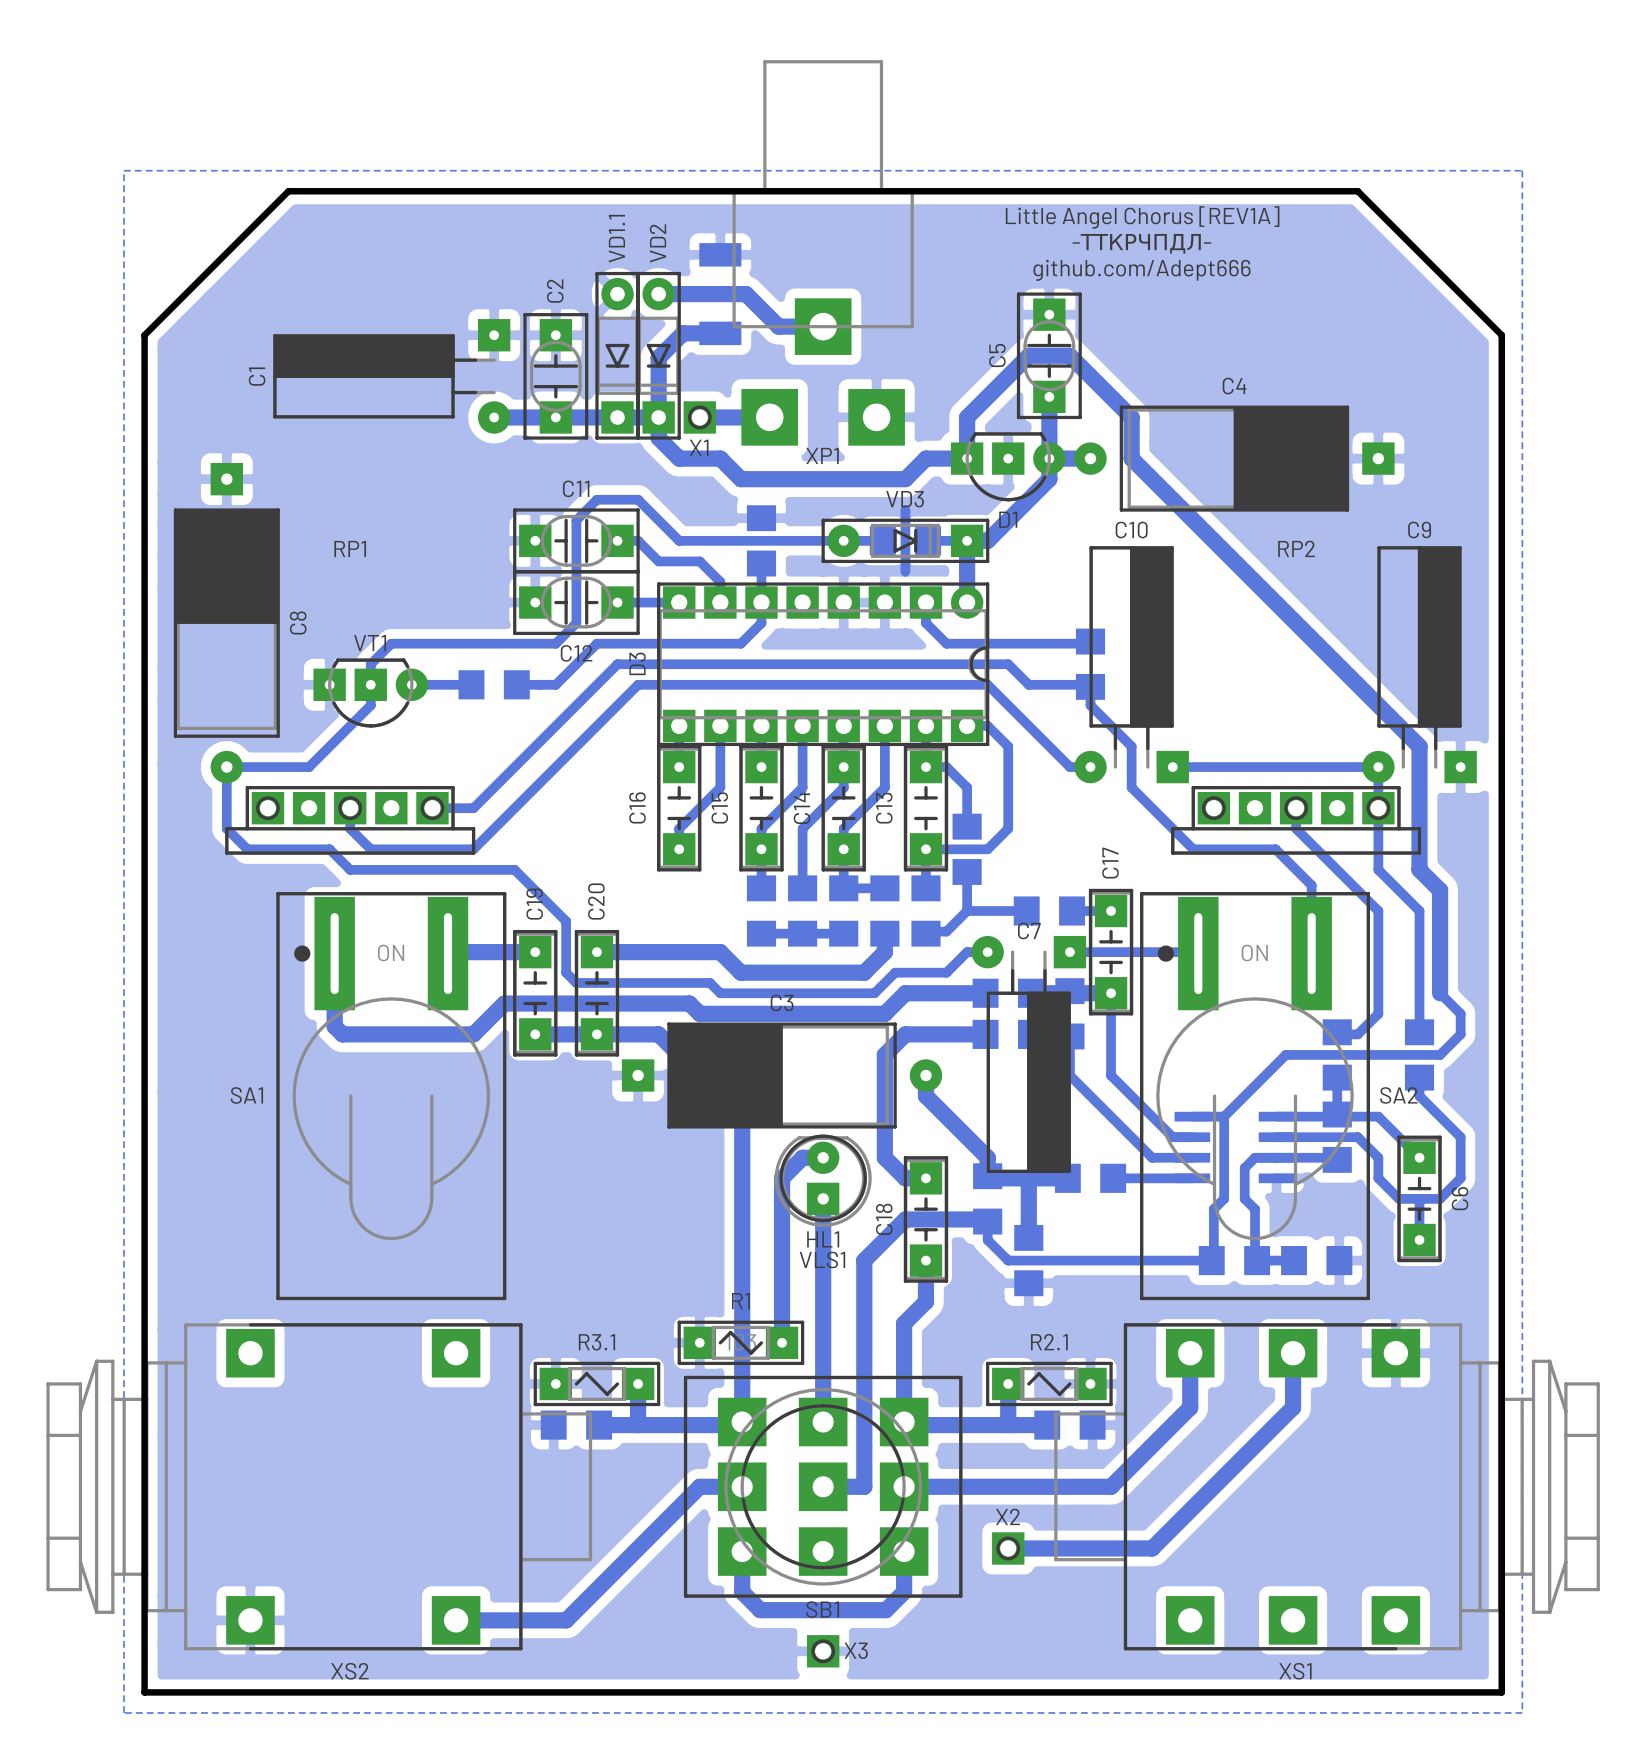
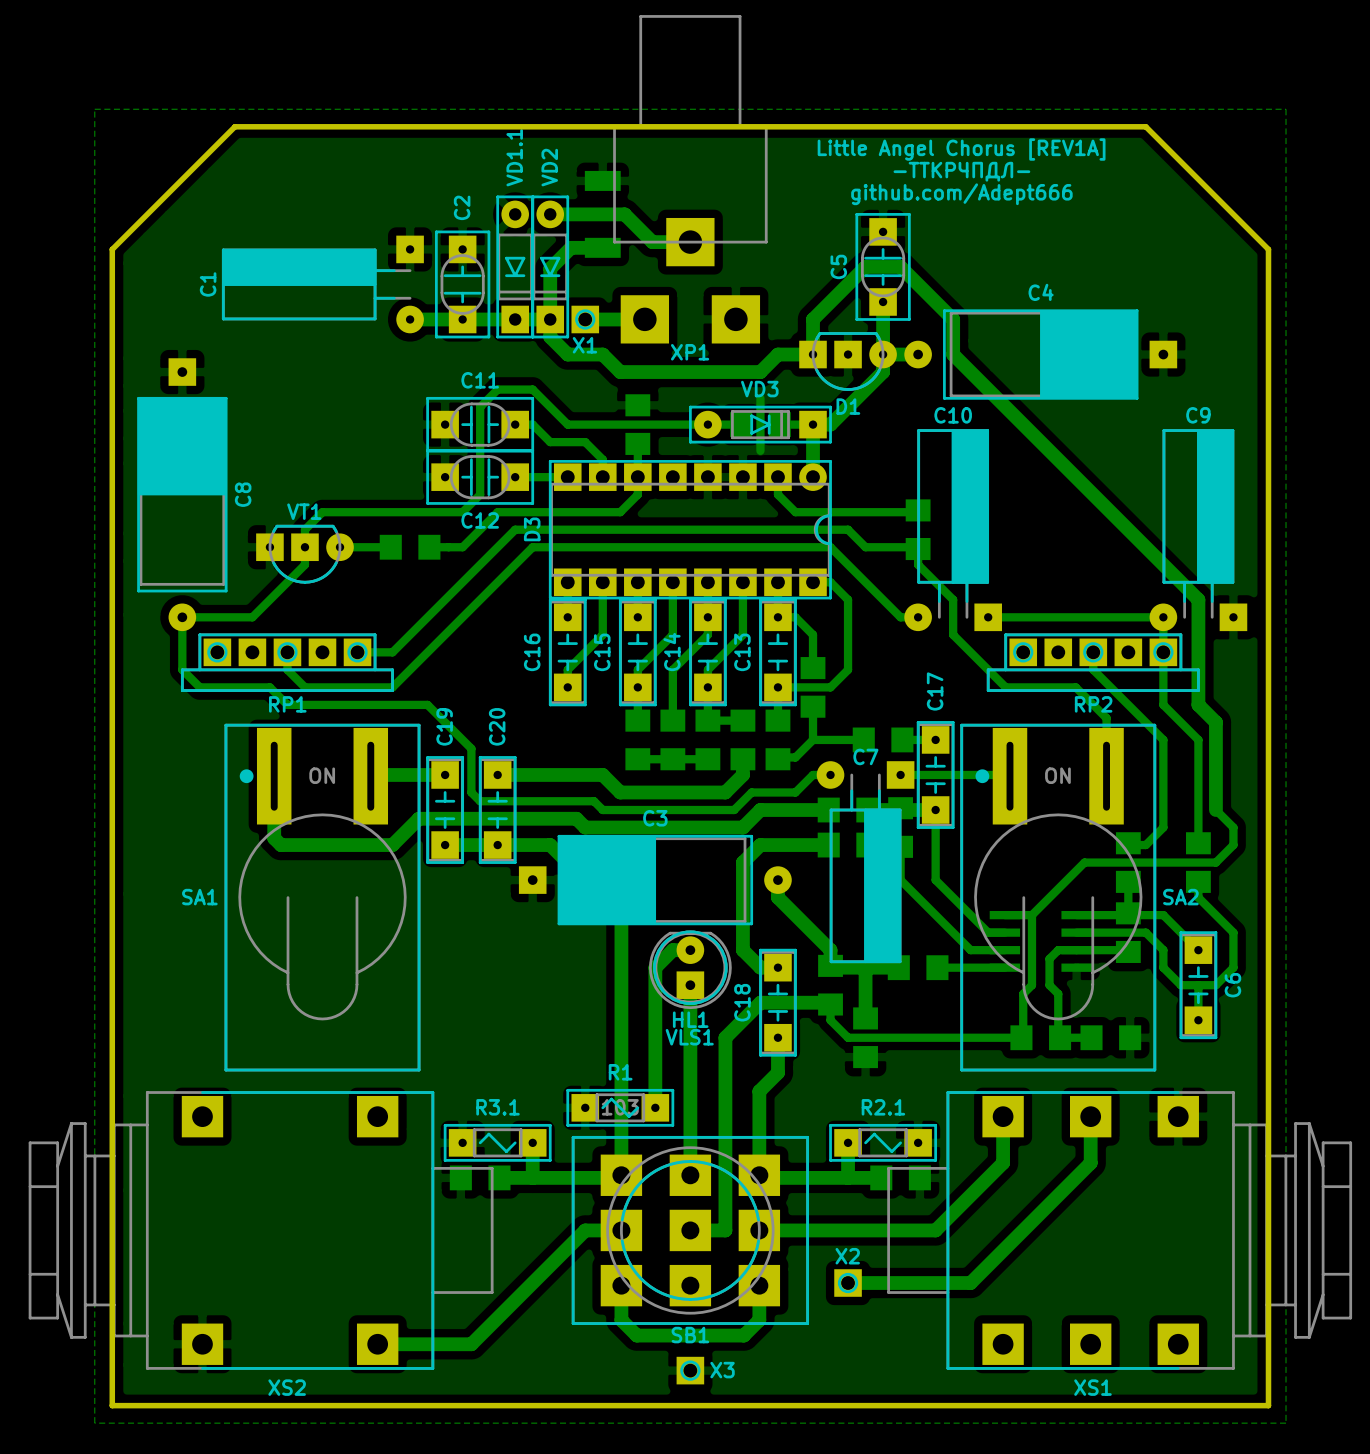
RP2 name position: RP2 (1296, 548) -> RP2 (1093, 704)
RP1 name position: RP1 (350, 549) -> RP1 (287, 704)

